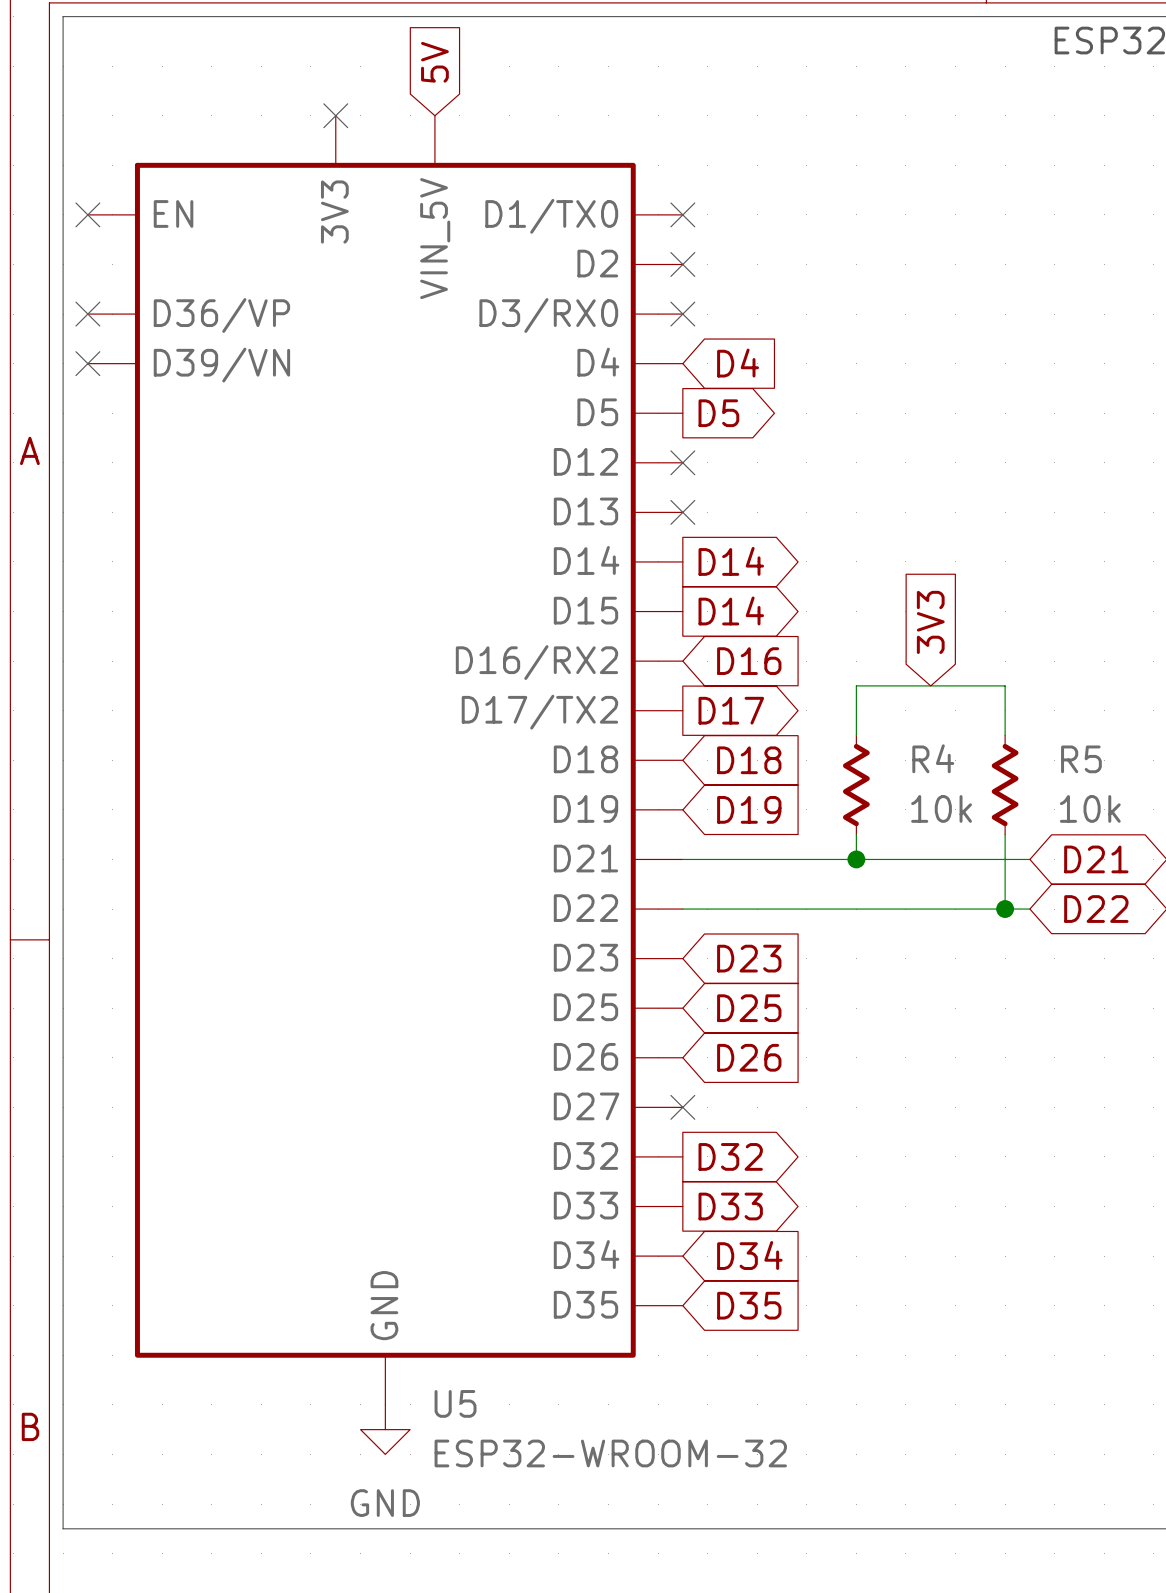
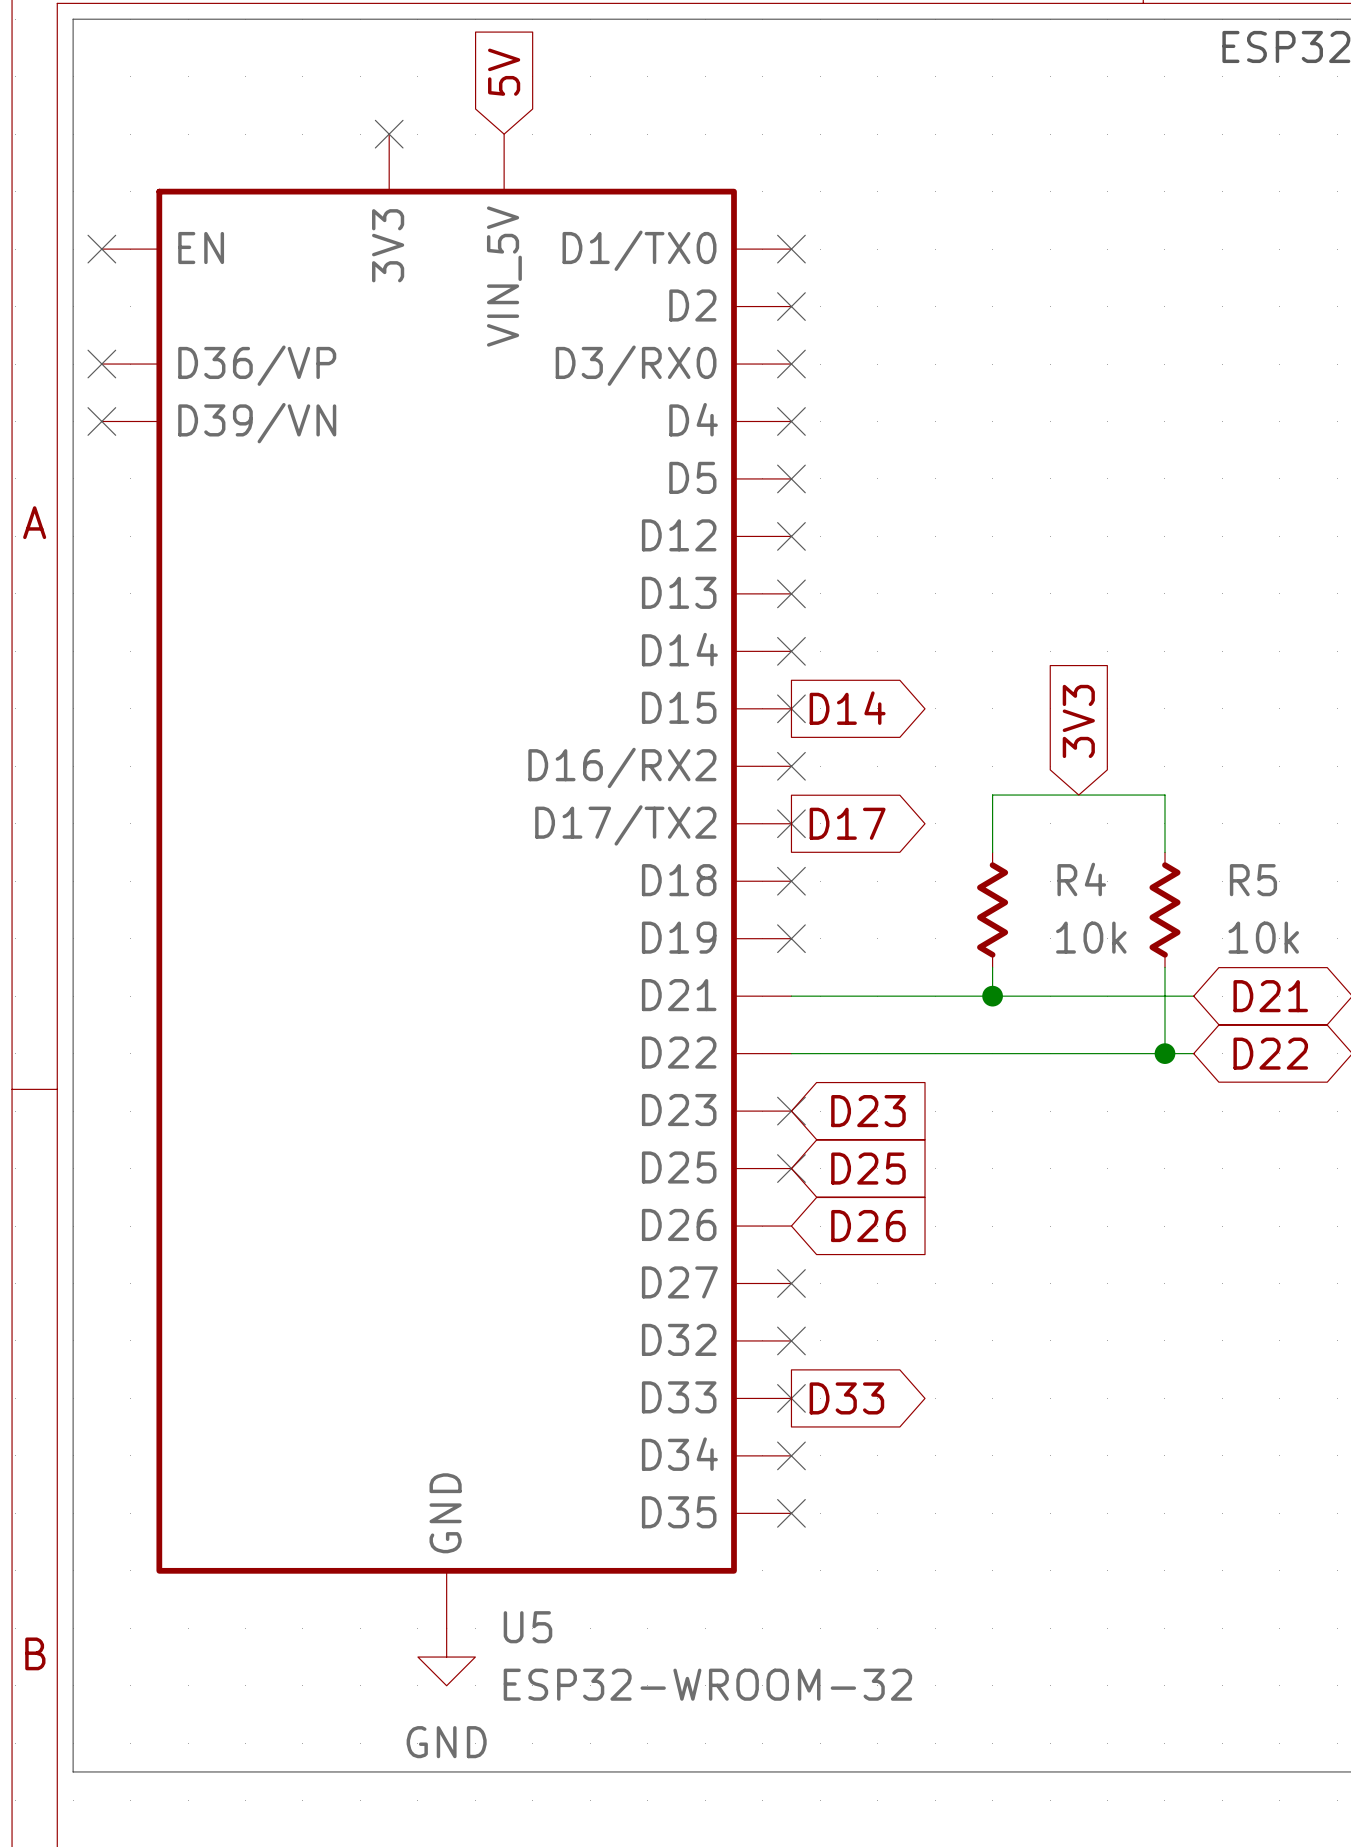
no-connect mark: none -> (791, 421)
global label: D4 (738, 363) -> none
no-connect mark: none -> (791, 478)
global label: D5 (718, 413) -> none
no-connect mark: none -> (791, 651)
global label: D14 (731, 561) -> none
no-connect mark: none -> (791, 708)
no-connect mark: none -> (791, 766)
global label: D16 (749, 661) -> none
no-connect mark: none -> (791, 823)
no-connect mark: none -> (791, 881)
global label: D18 (749, 760) -> none
no-connect mark: none -> (791, 938)
global label: D19 (749, 809) -> none
no-connect mark: none -> (791, 1111)
no-connect mark: none -> (791, 1168)
no-connect mark: none -> (791, 1340)
global label: D32 (730, 1156) -> none
no-connect mark: none -> (791, 1398)
global label: D34 (749, 1255) -> none
no-connect mark: none -> (791, 1455)
no-connect mark: none -> (791, 1513)
global label: D35 (749, 1305) -> none

